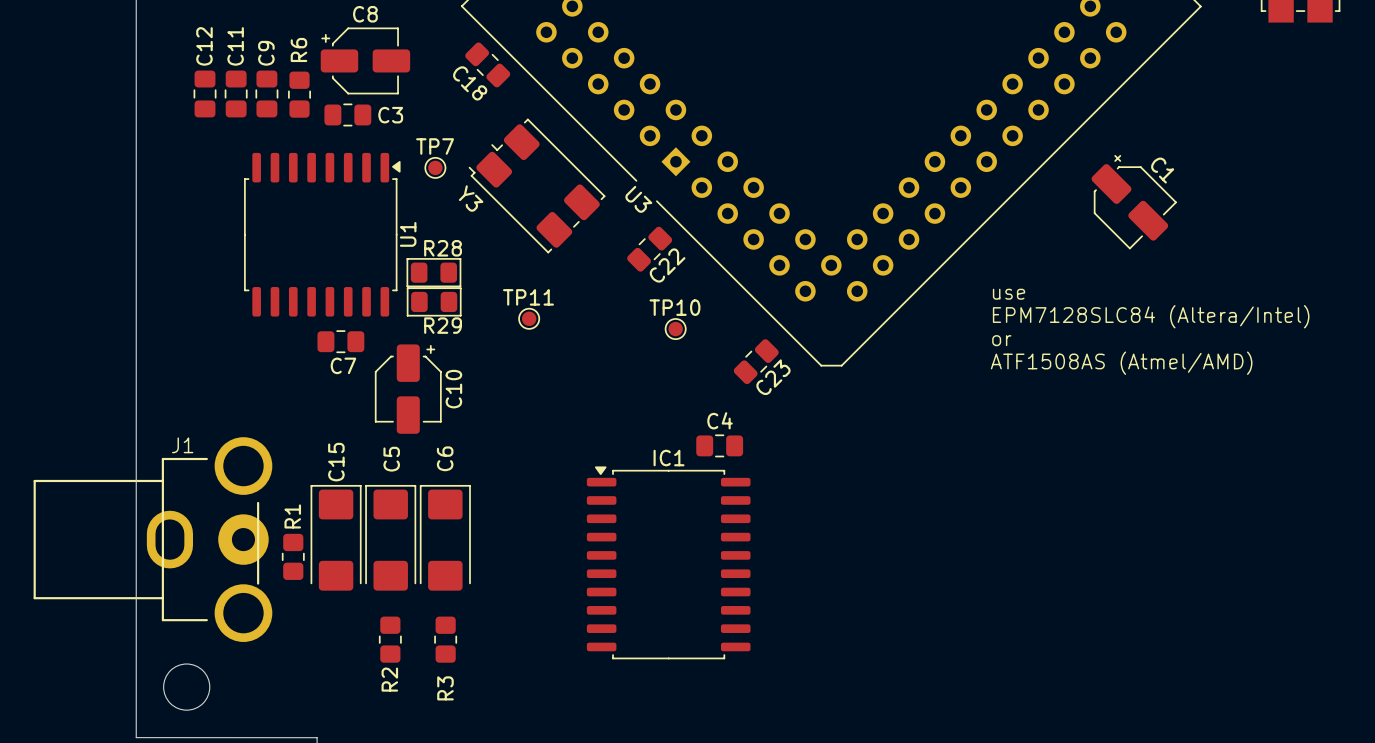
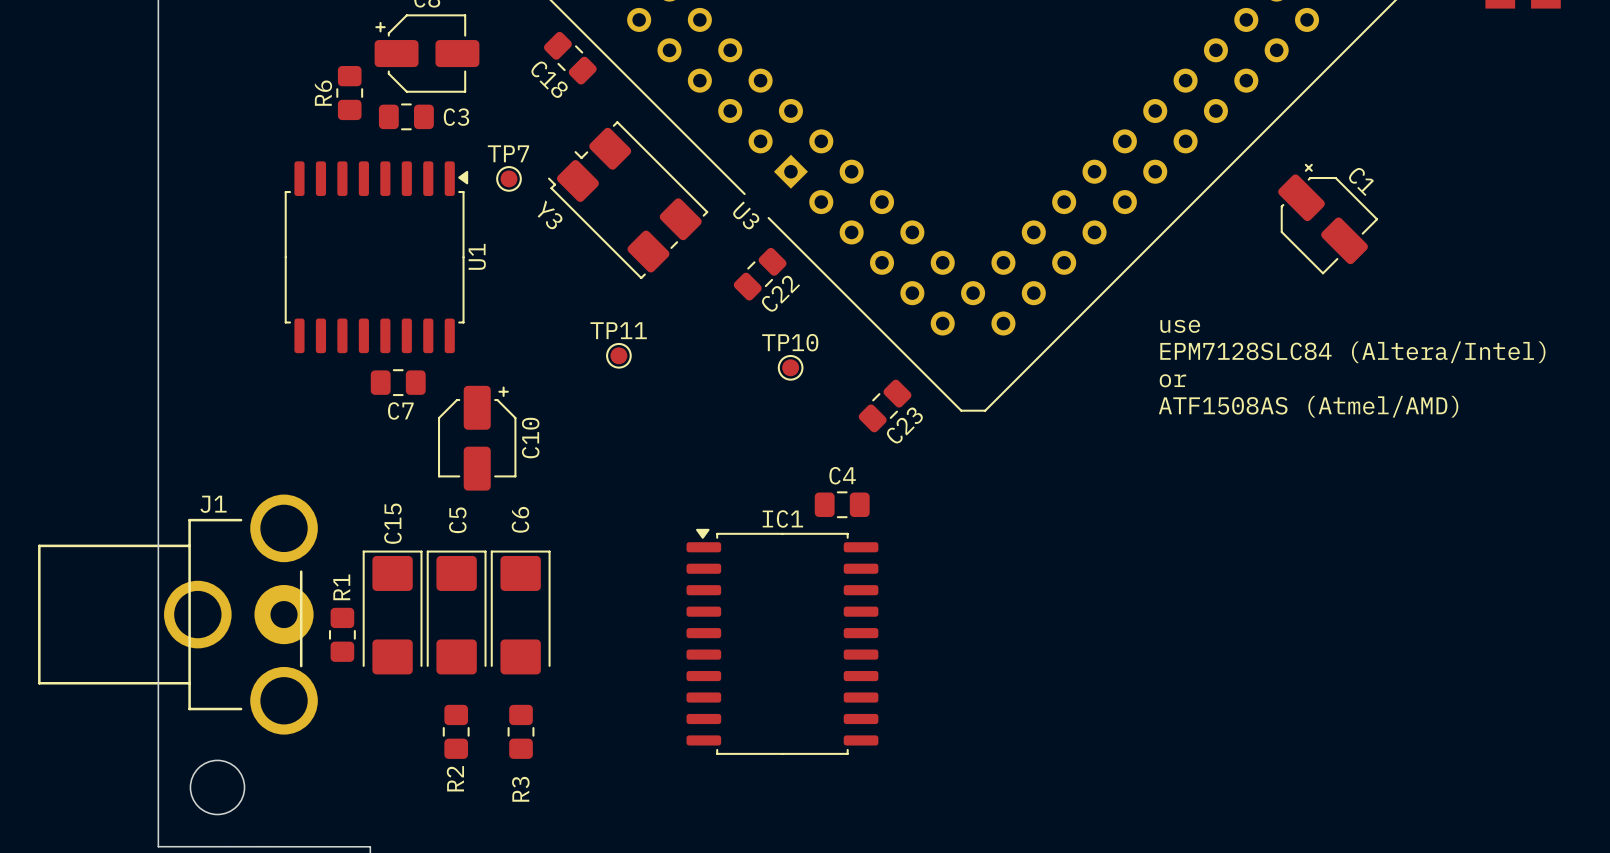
R6 name position: R6 (298, 49) -> R6 (323, 93)
C12: (205, 93) -> none
C11: (236, 93) -> none
C9: (266, 93) -> none
R28: (433, 272) -> none
R29: (434, 301) -> none
J1 footprint: [33, 437, 273, 642] -> [38, 494, 318, 735]

